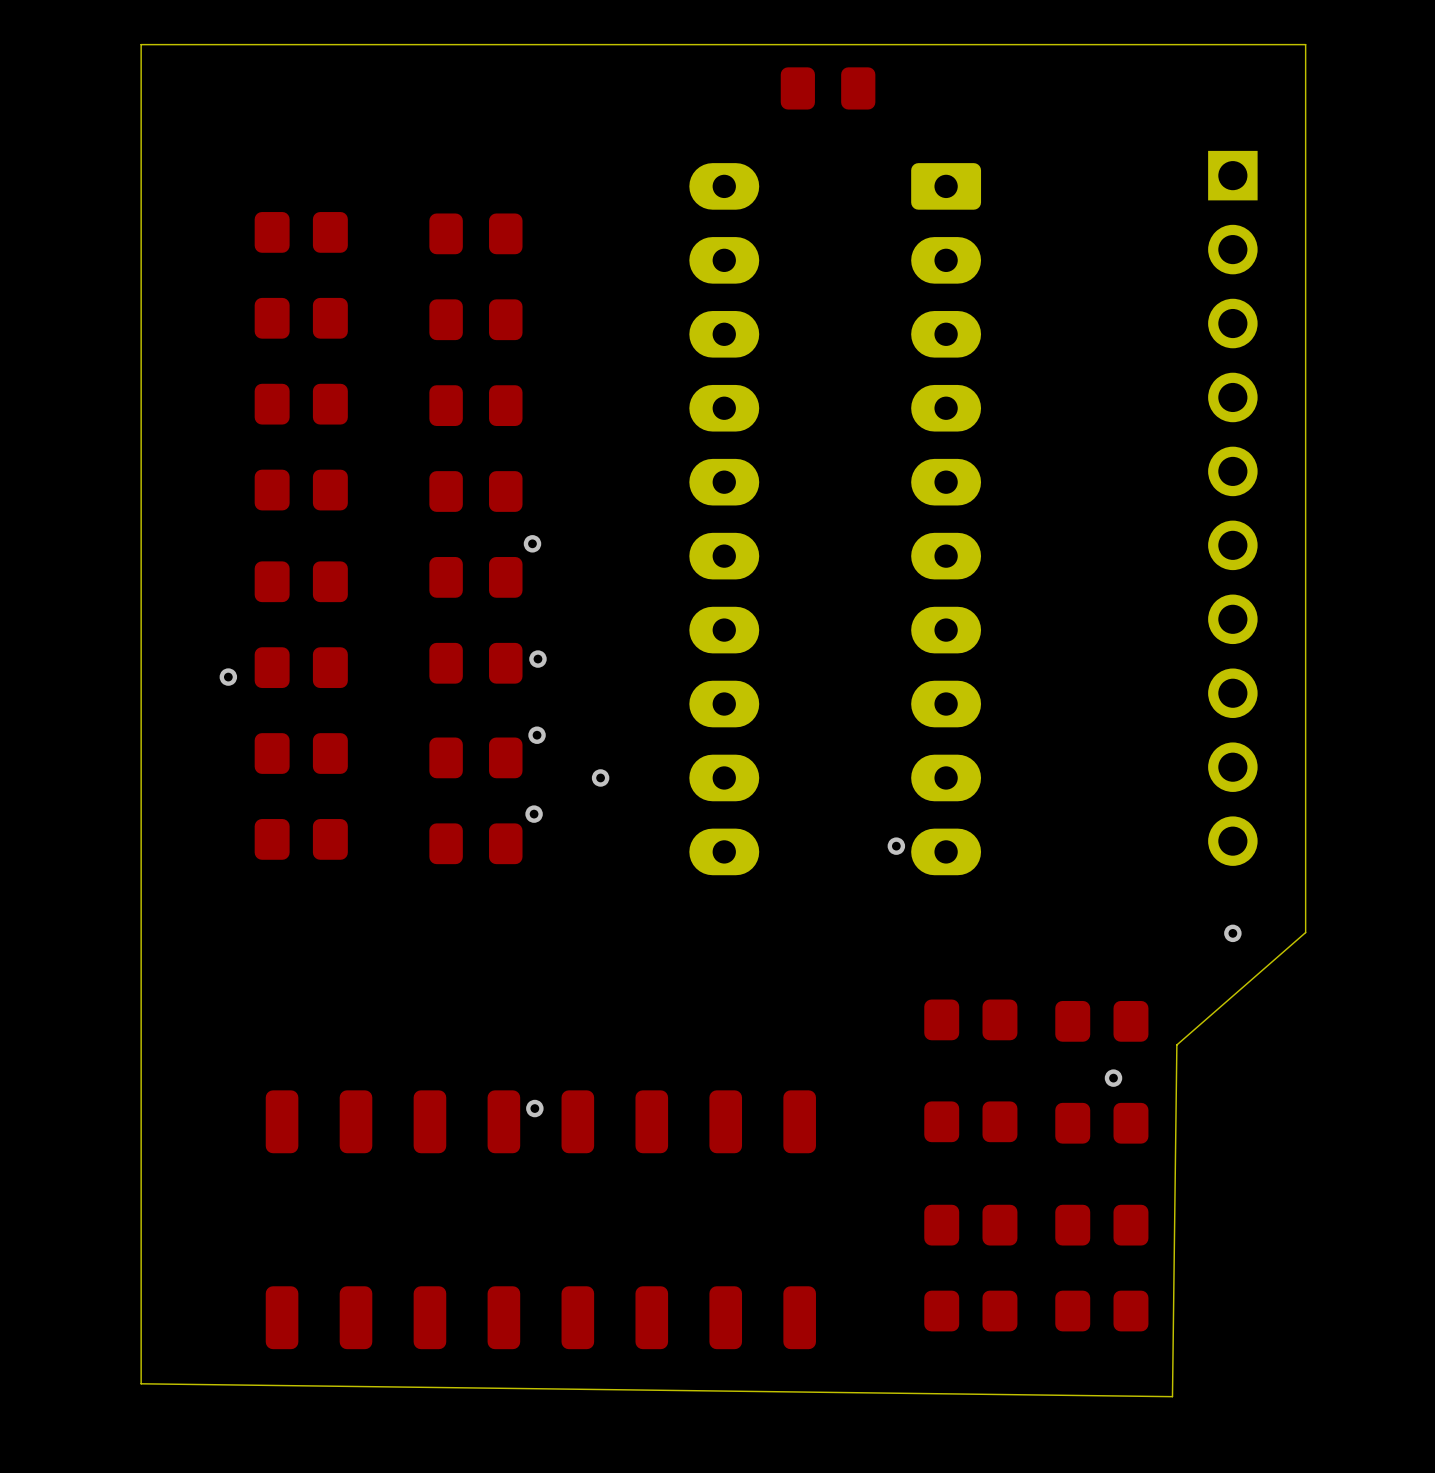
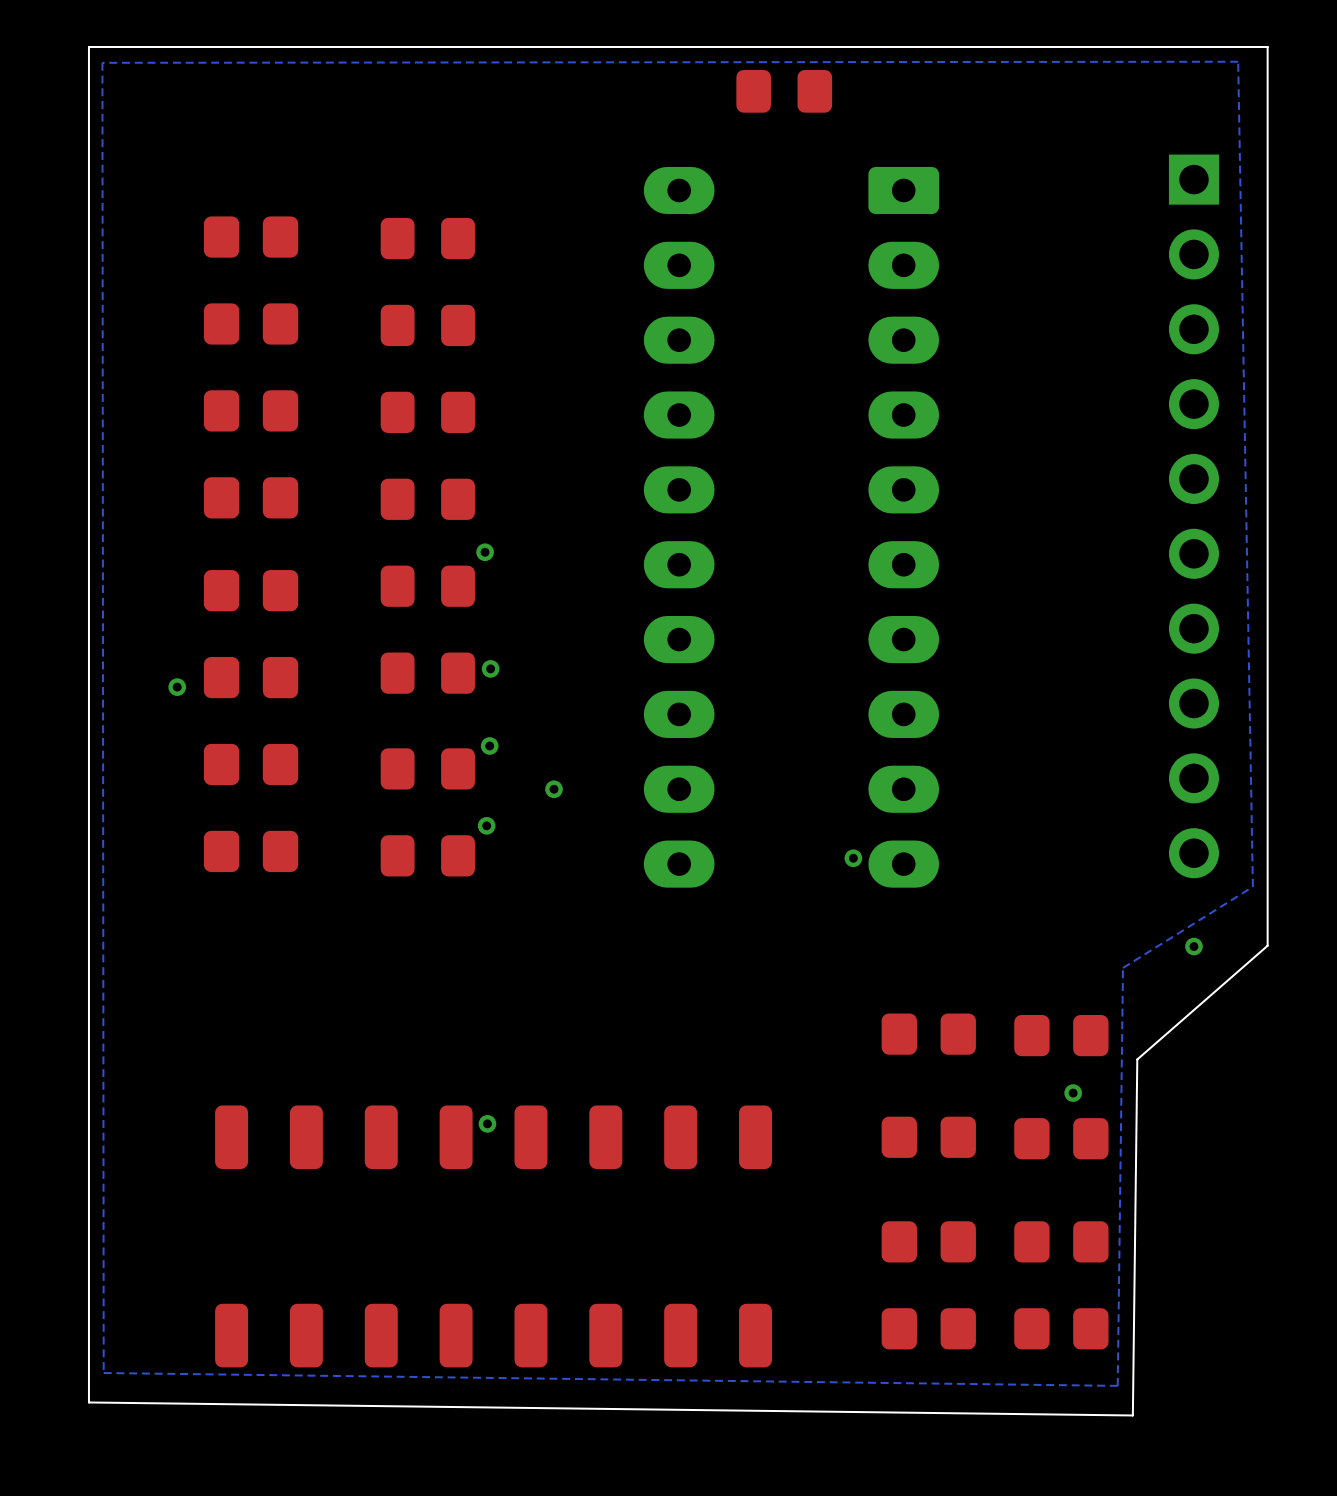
bottom zone outline: none -> (1238, 61) (102, 62) (103, 1373) (1117, 1385) (1123, 967) (1252, 886) (1238, 61)

